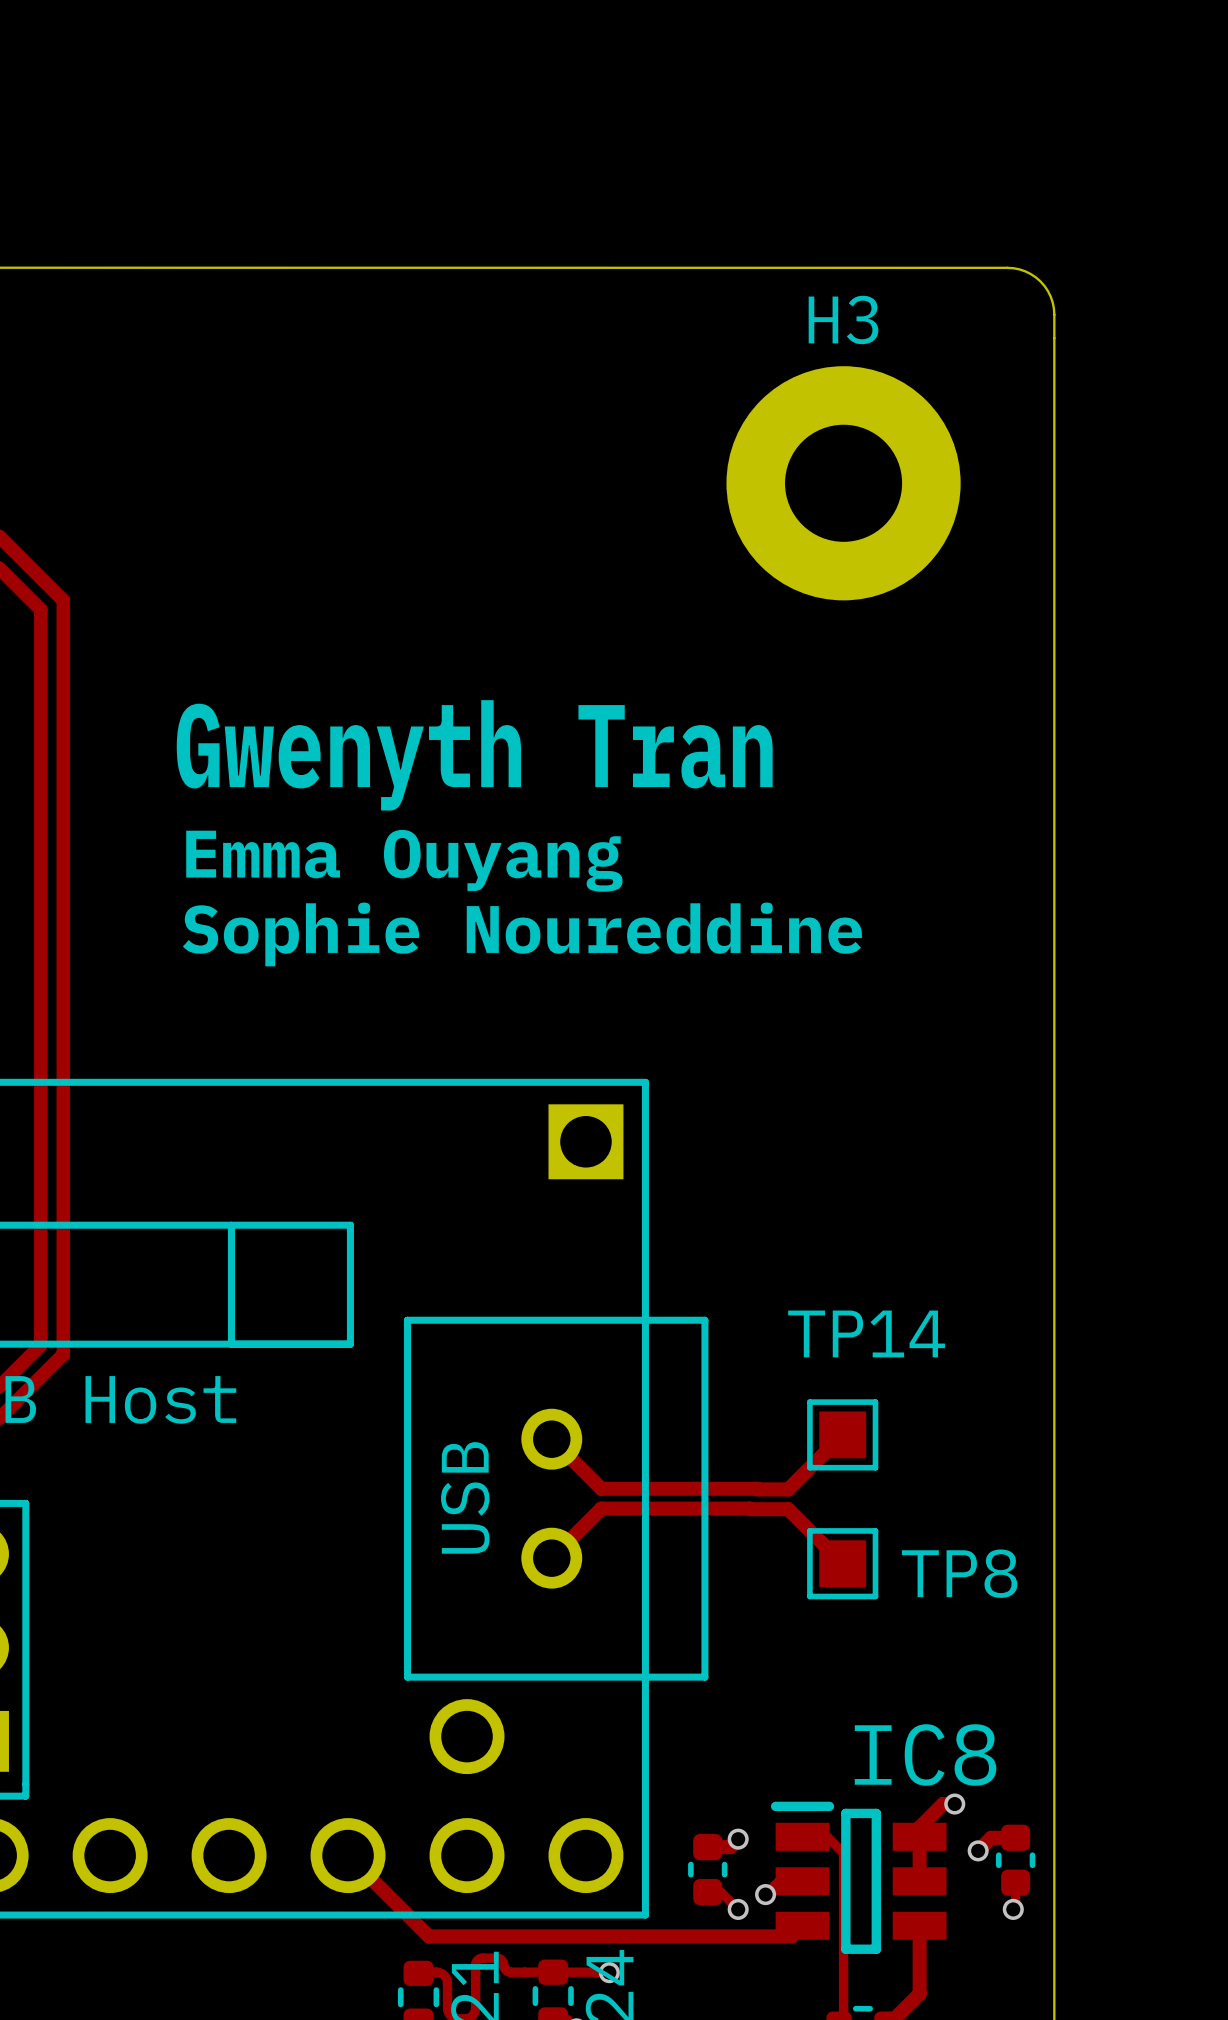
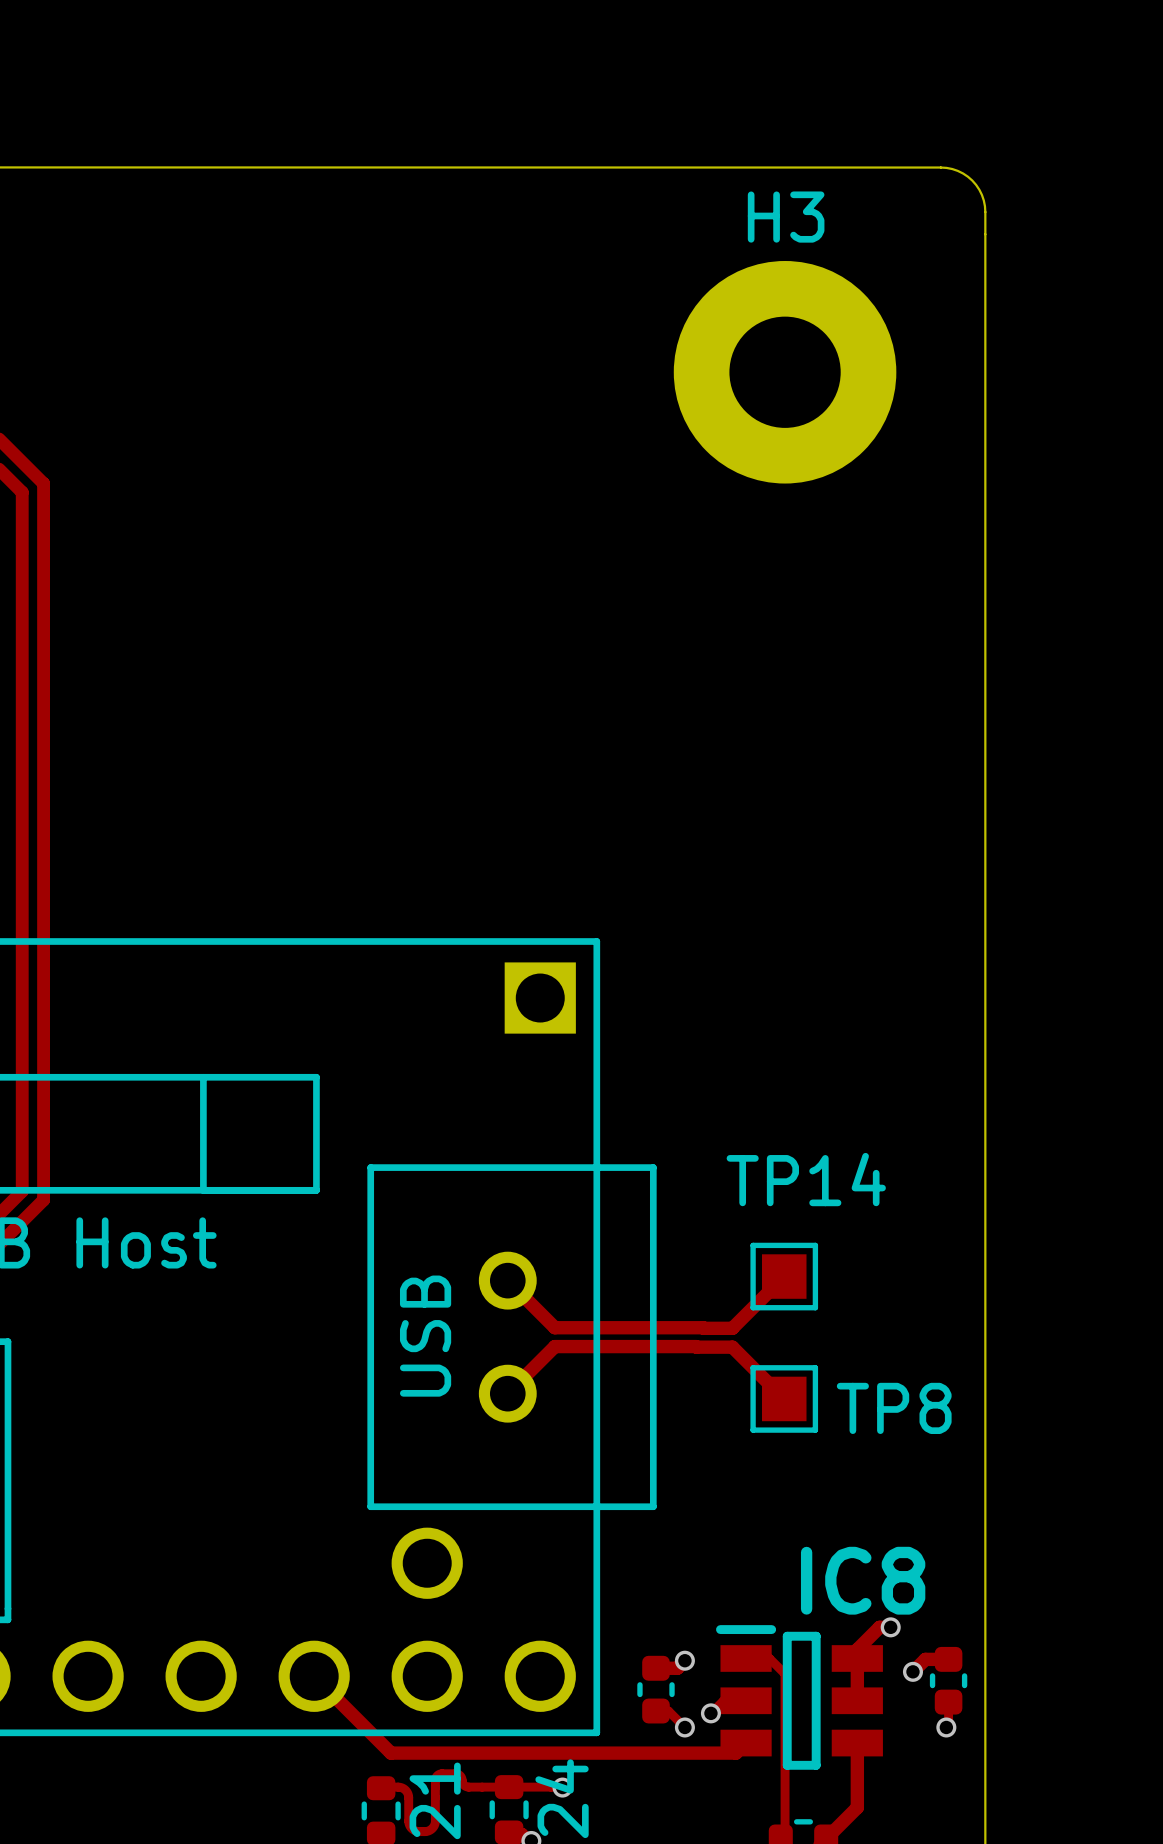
text: Gwenyth Tran (474, 755) -> none
text: Emma Ouyang (404, 860) -> none
text: Sophie Noureddine (522, 934) -> none

